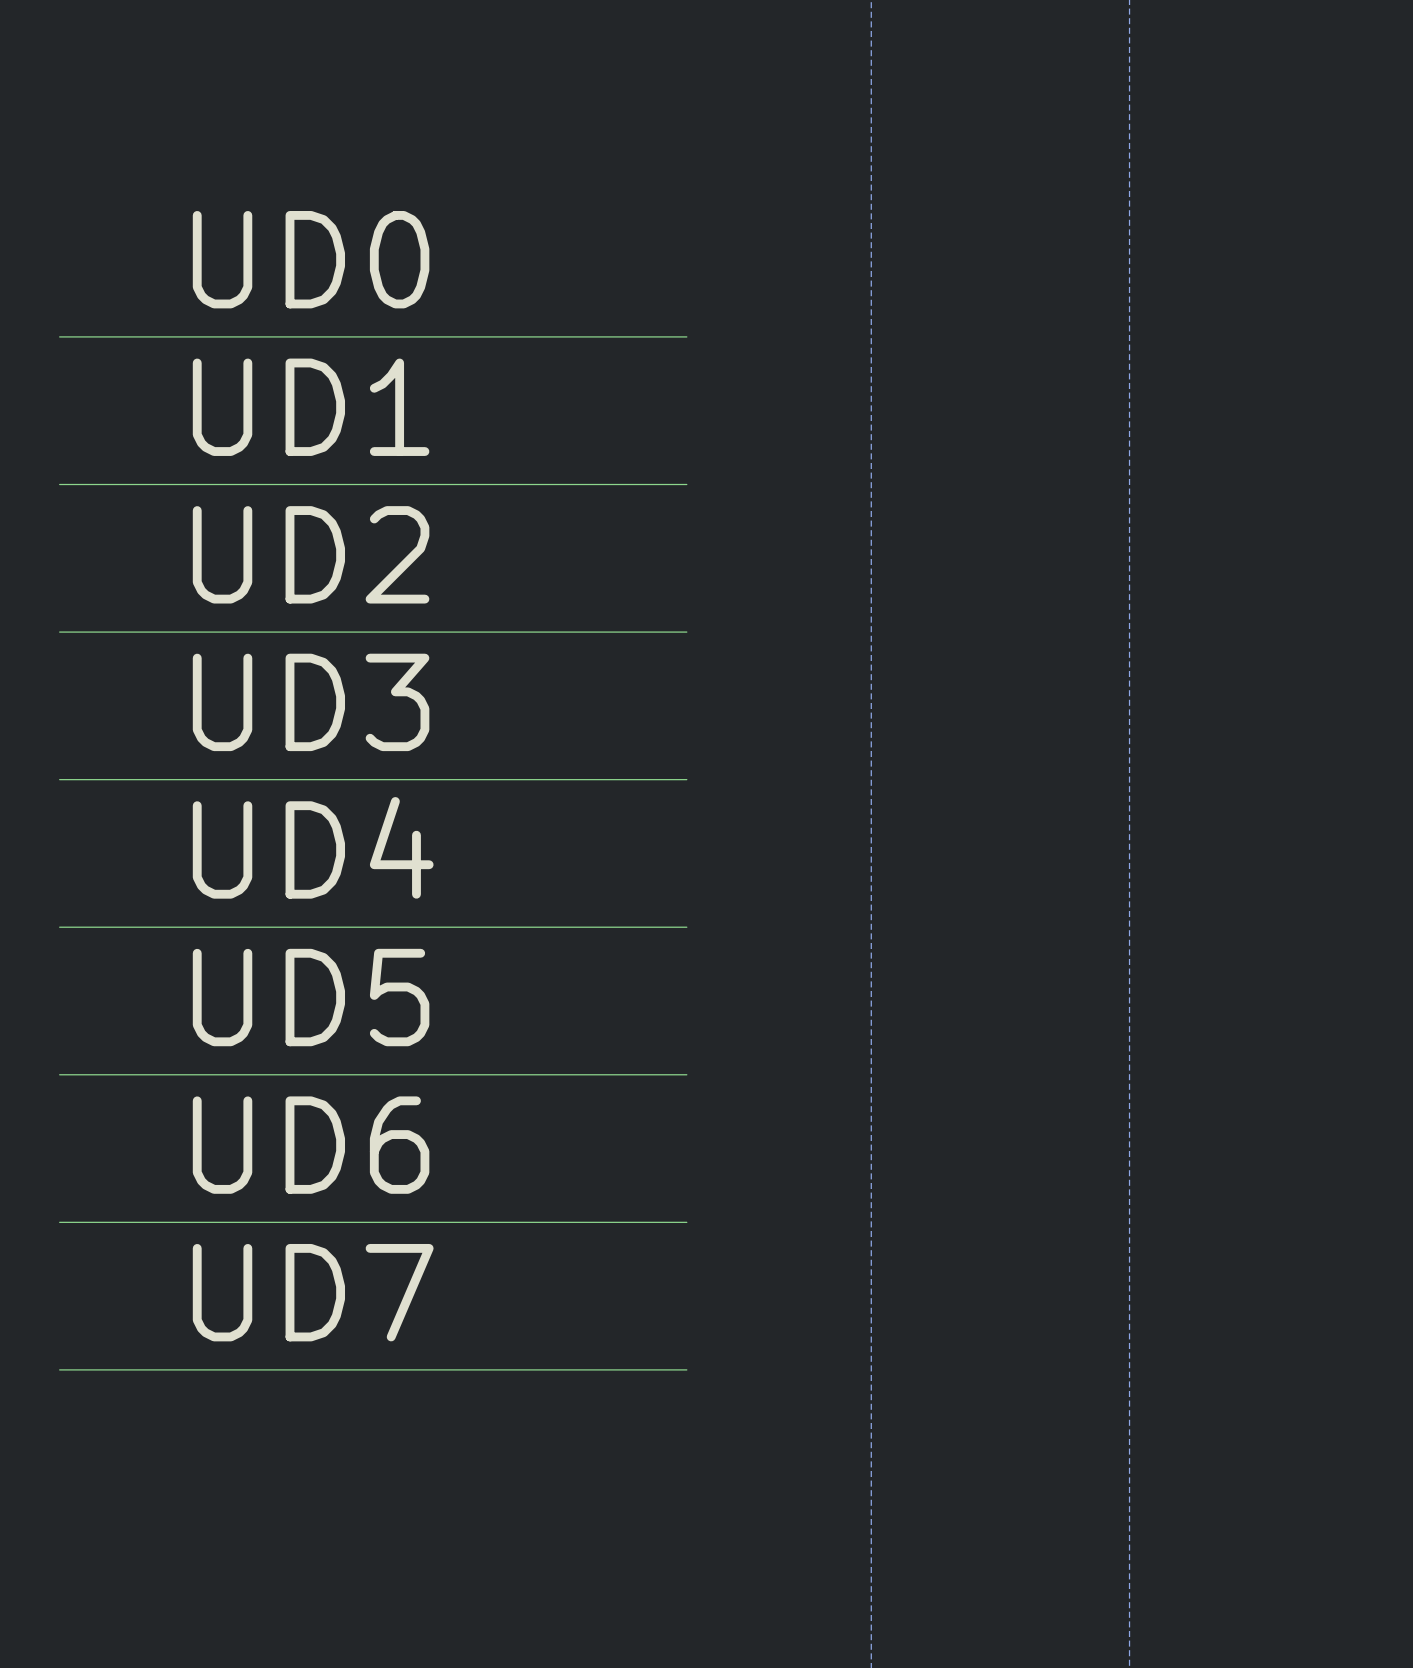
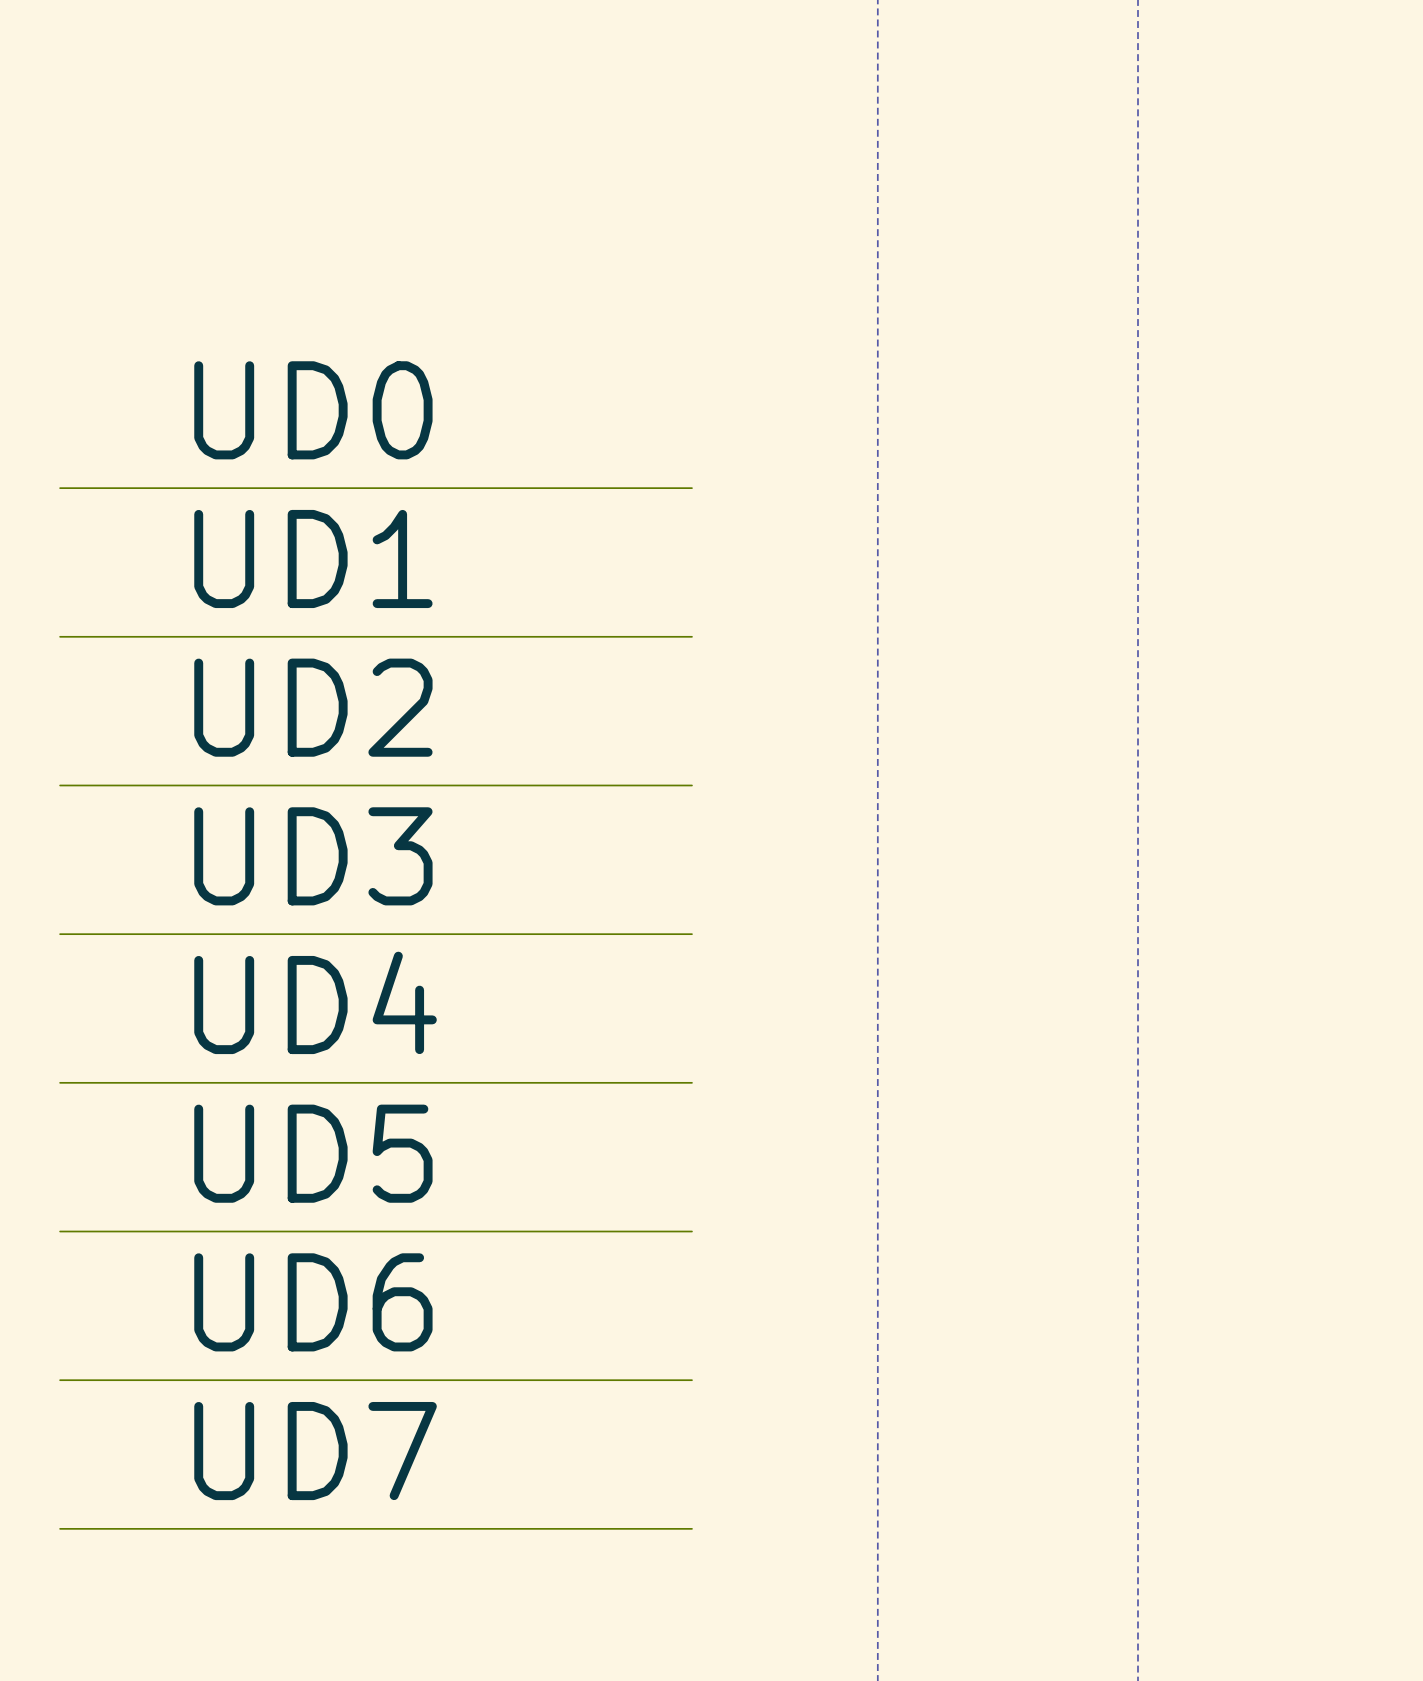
label: UD0 (311, 259) -> none
wire: (59, 336) (686, 336) -> (60, 1528) (691, 1528)
label: UD1 (311, 407) -> UD0 (313, 410)
label: UD2 (311, 554) -> UD1 (313, 558)
label: UD3 (311, 702) -> UD2 (313, 707)
label: UD4 (313, 847) -> UD3 (313, 856)
label: UD5 (311, 997) -> UD4 (315, 1002)
label: UD6 (311, 1145) -> UD5 (313, 1153)
label: UD7 (313, 1292) -> UD6 (313, 1302)
label: none -> UD7 (315, 1451)

